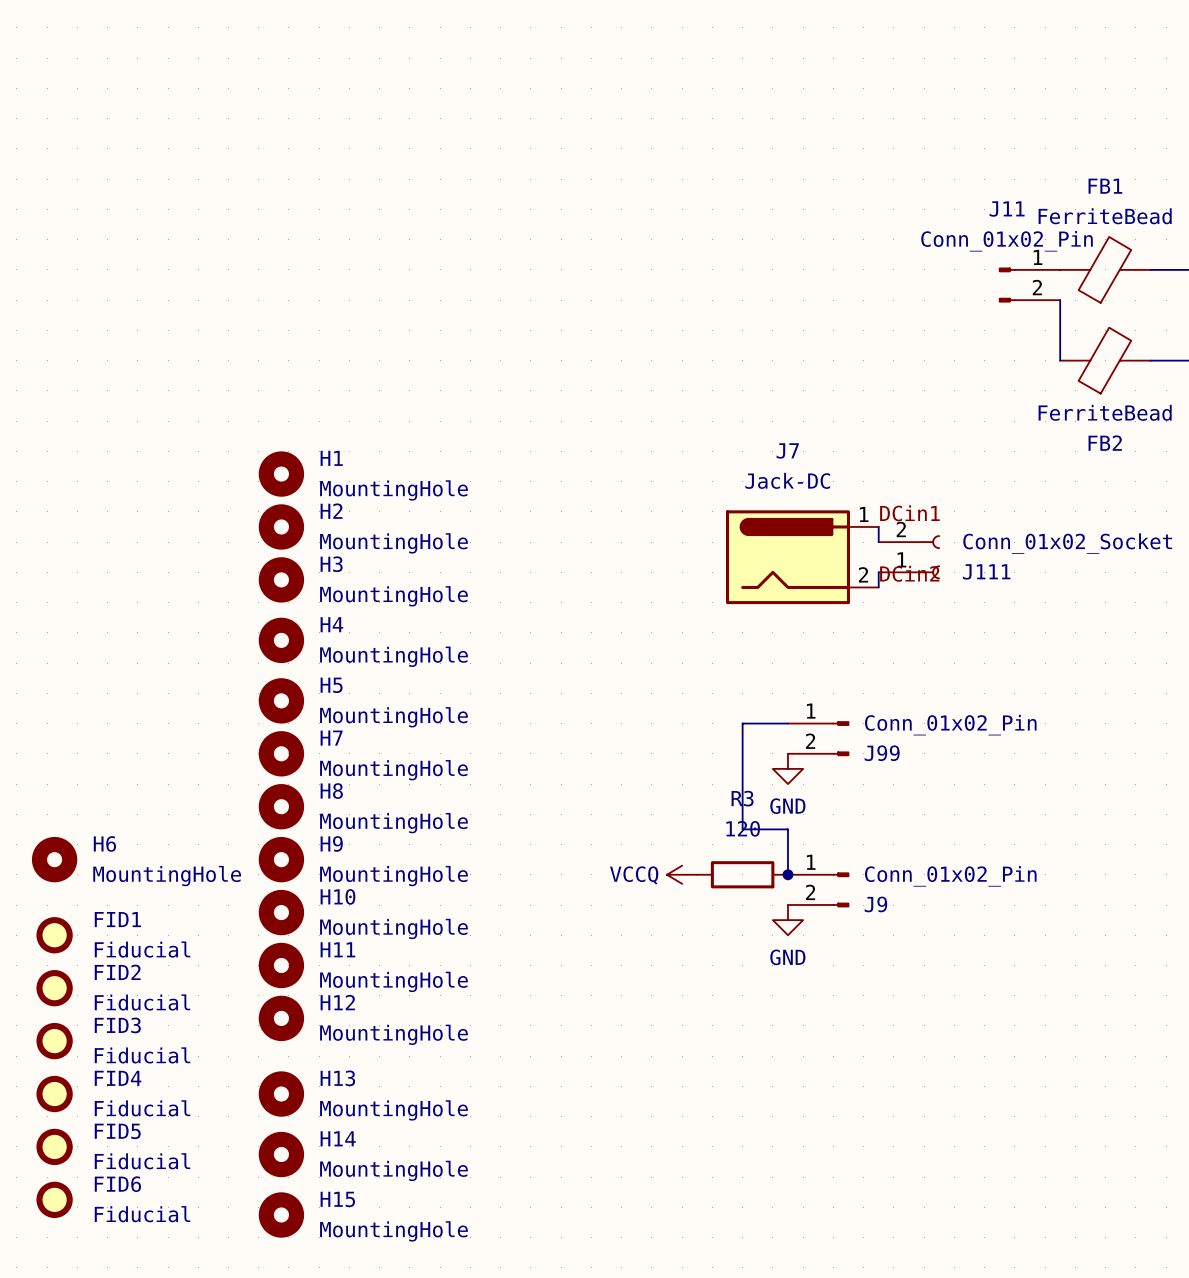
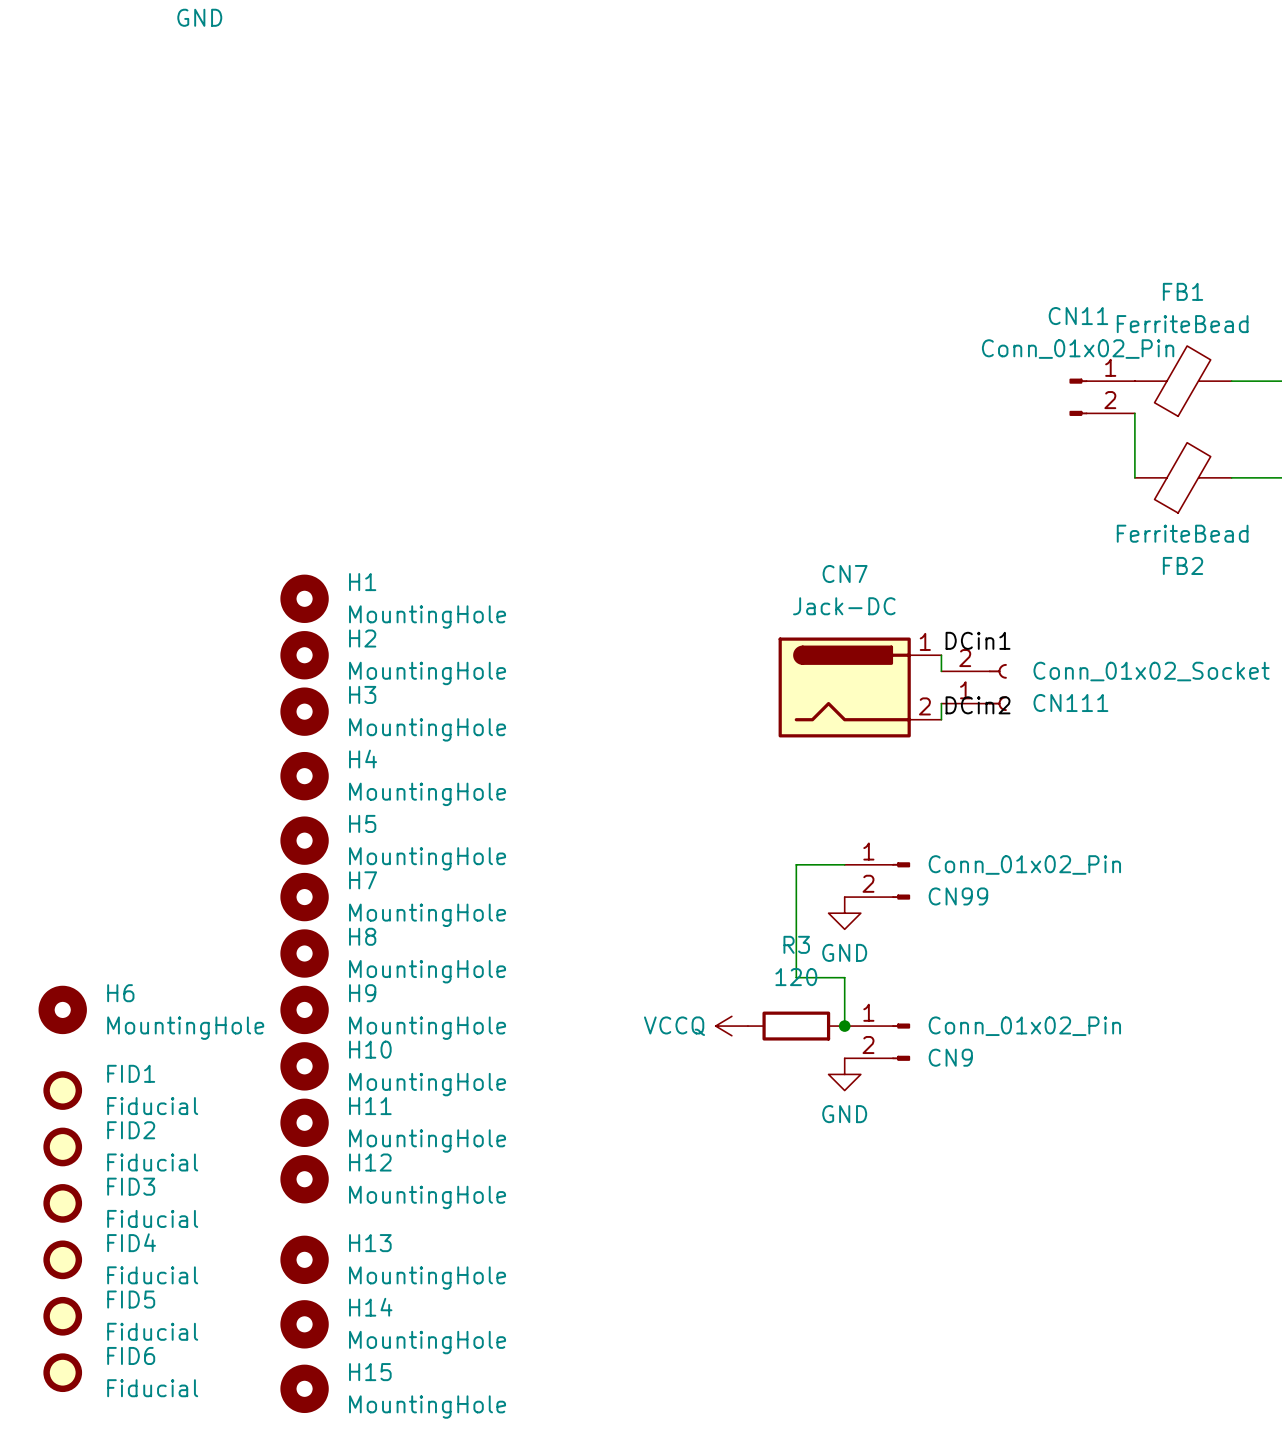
J11 name: J11 (1007, 209) -> CN11 (1078, 316)
J7 name: J7 (787, 450) -> CN7 (845, 574)
J111 name: J111 (986, 571) -> CN111 (1070, 702)
J99 name: J99 (882, 753) -> CN99 (958, 896)
J9 name: J9 (875, 904) -> CN9 (950, 1057)

